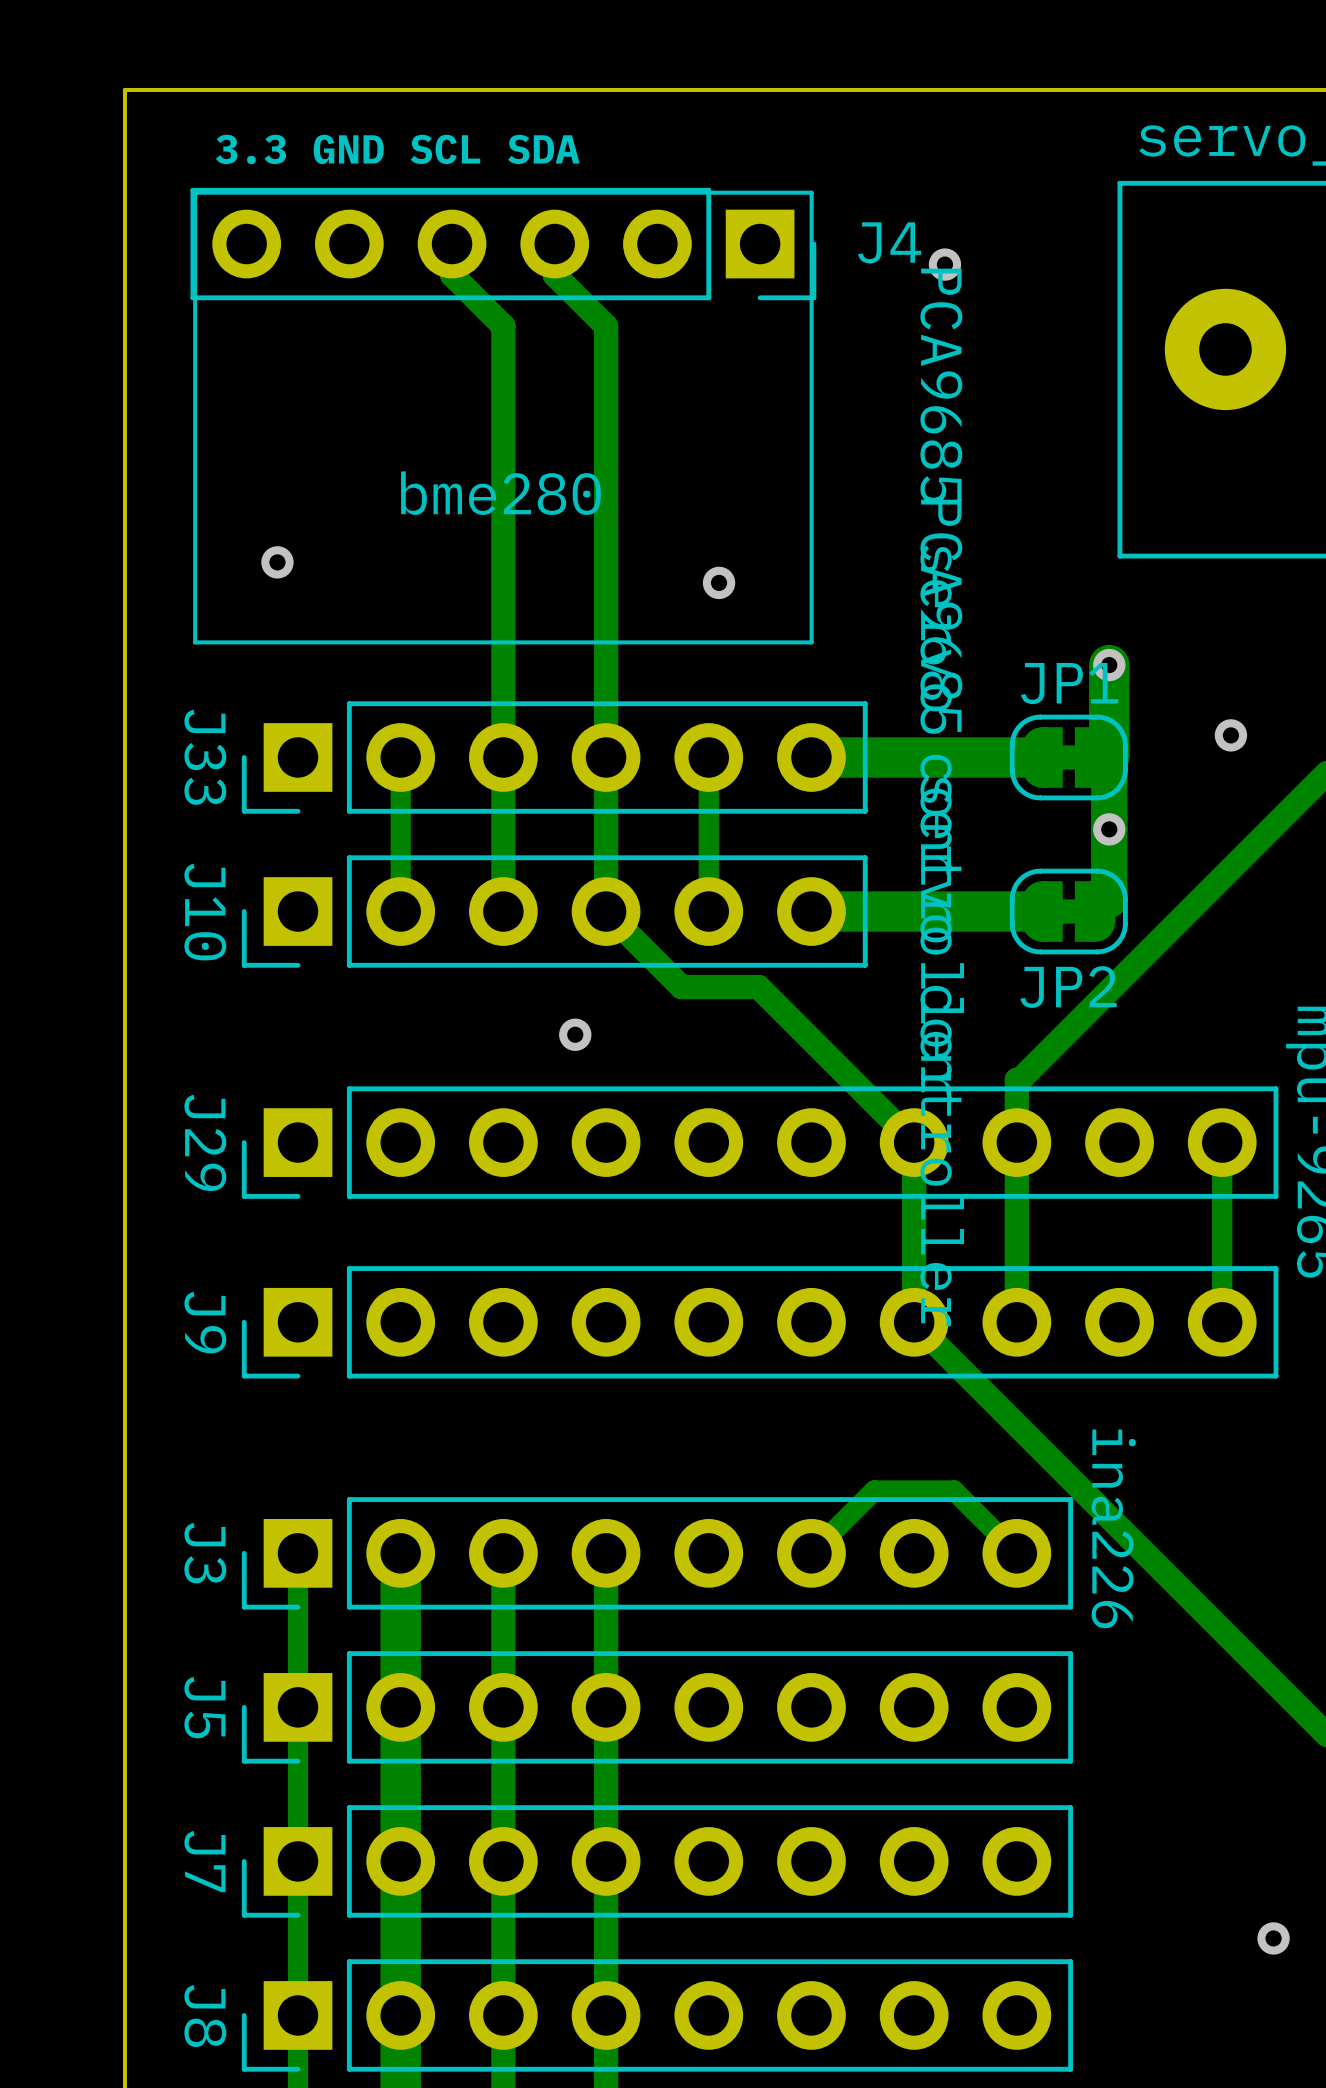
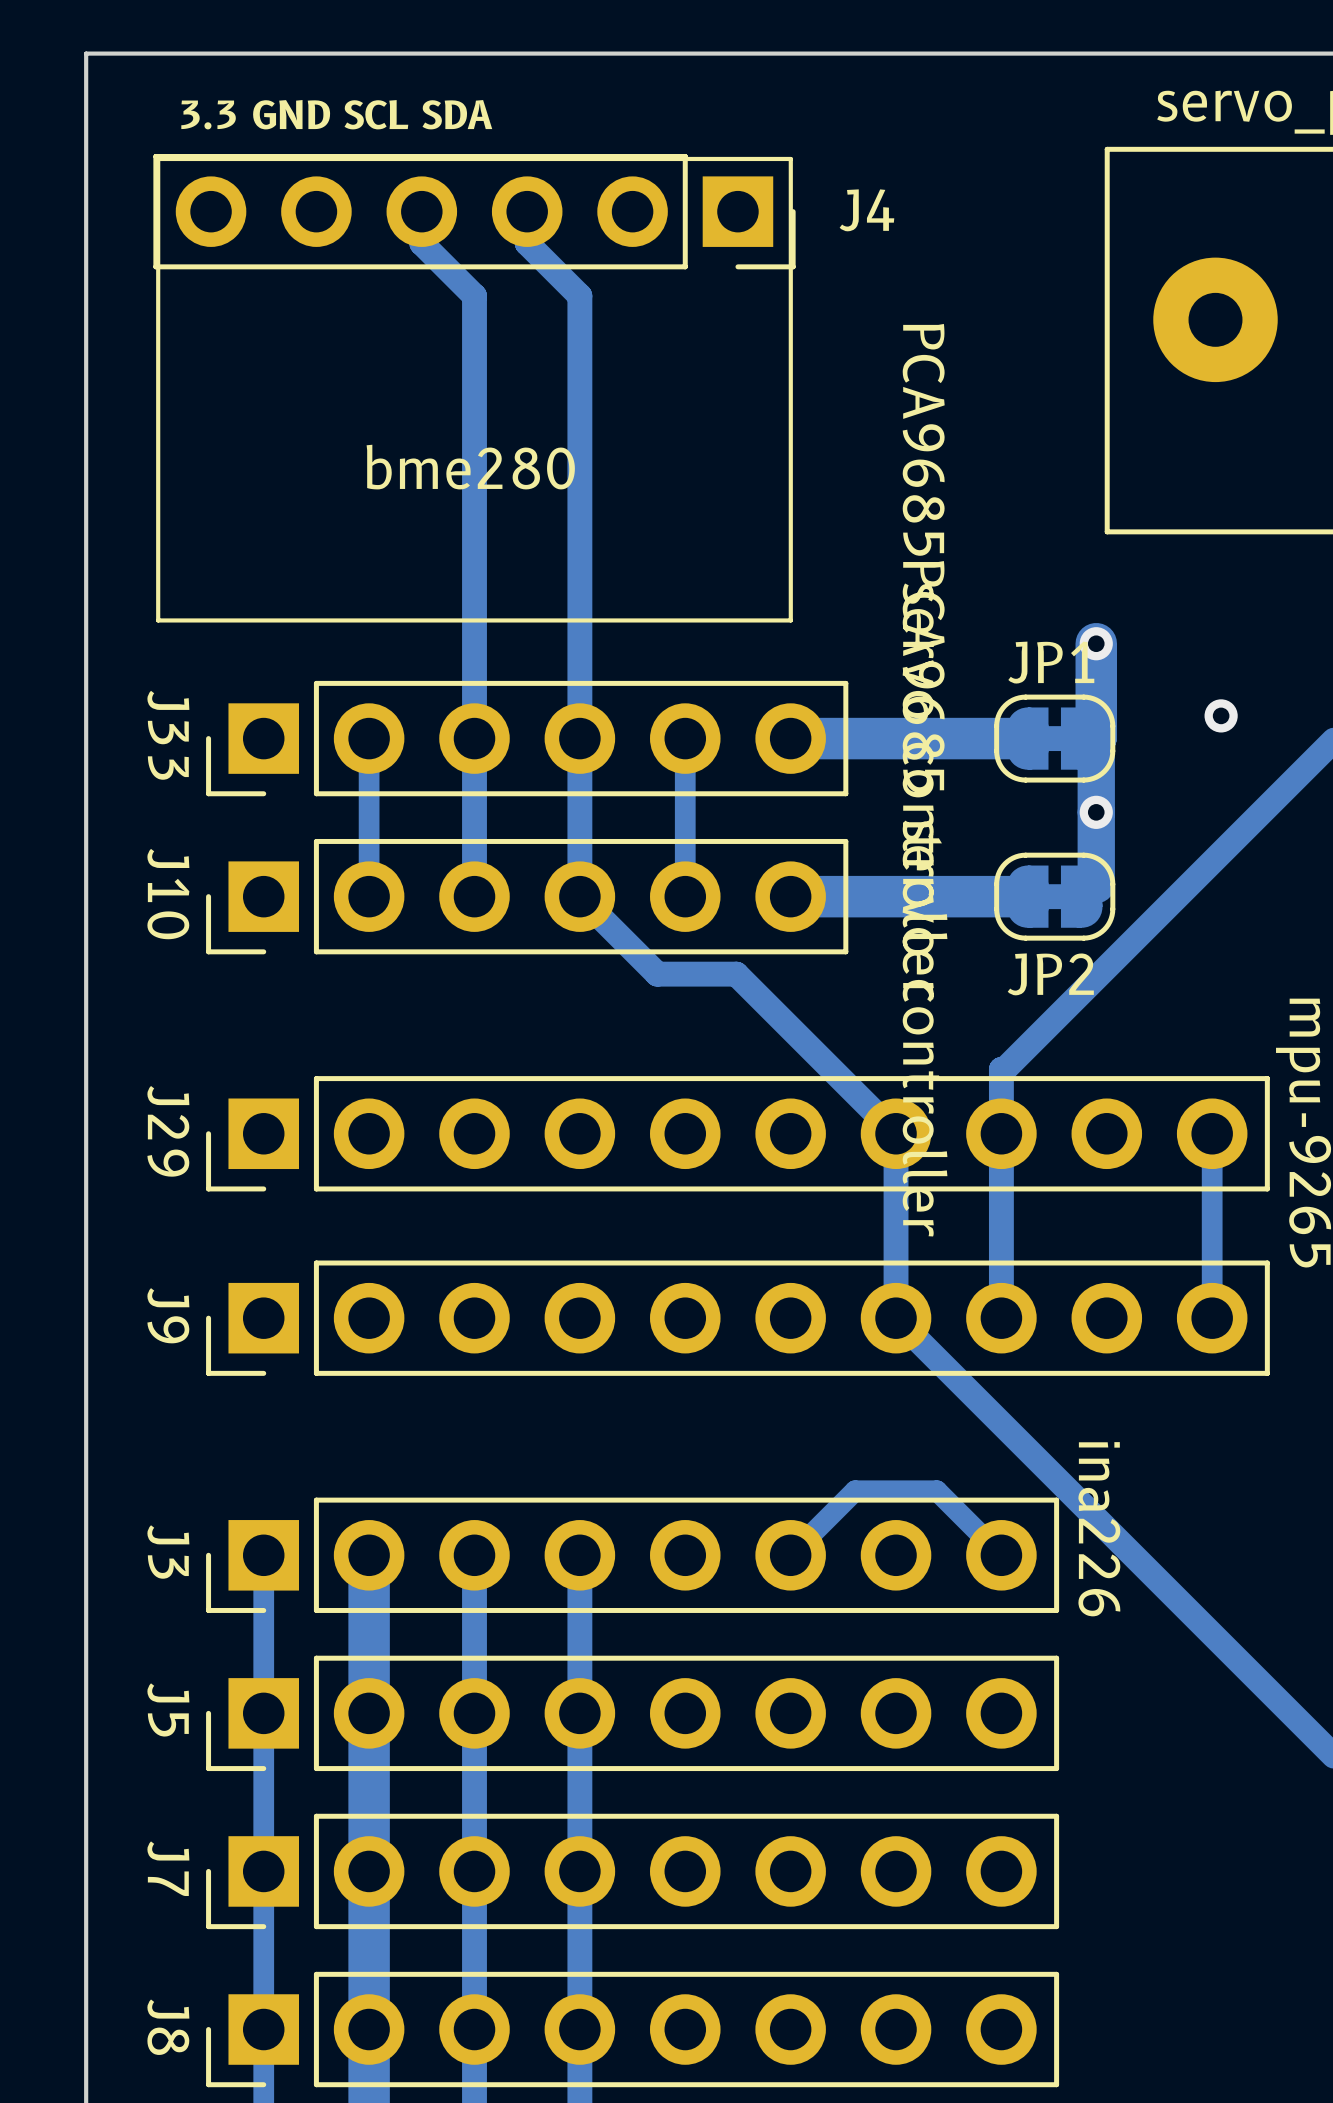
via: (944, 264) -> none
via: (277, 562) -> none
via: (719, 582) -> none
via: (575, 1034) -> none
via: (1273, 1938) -> none

